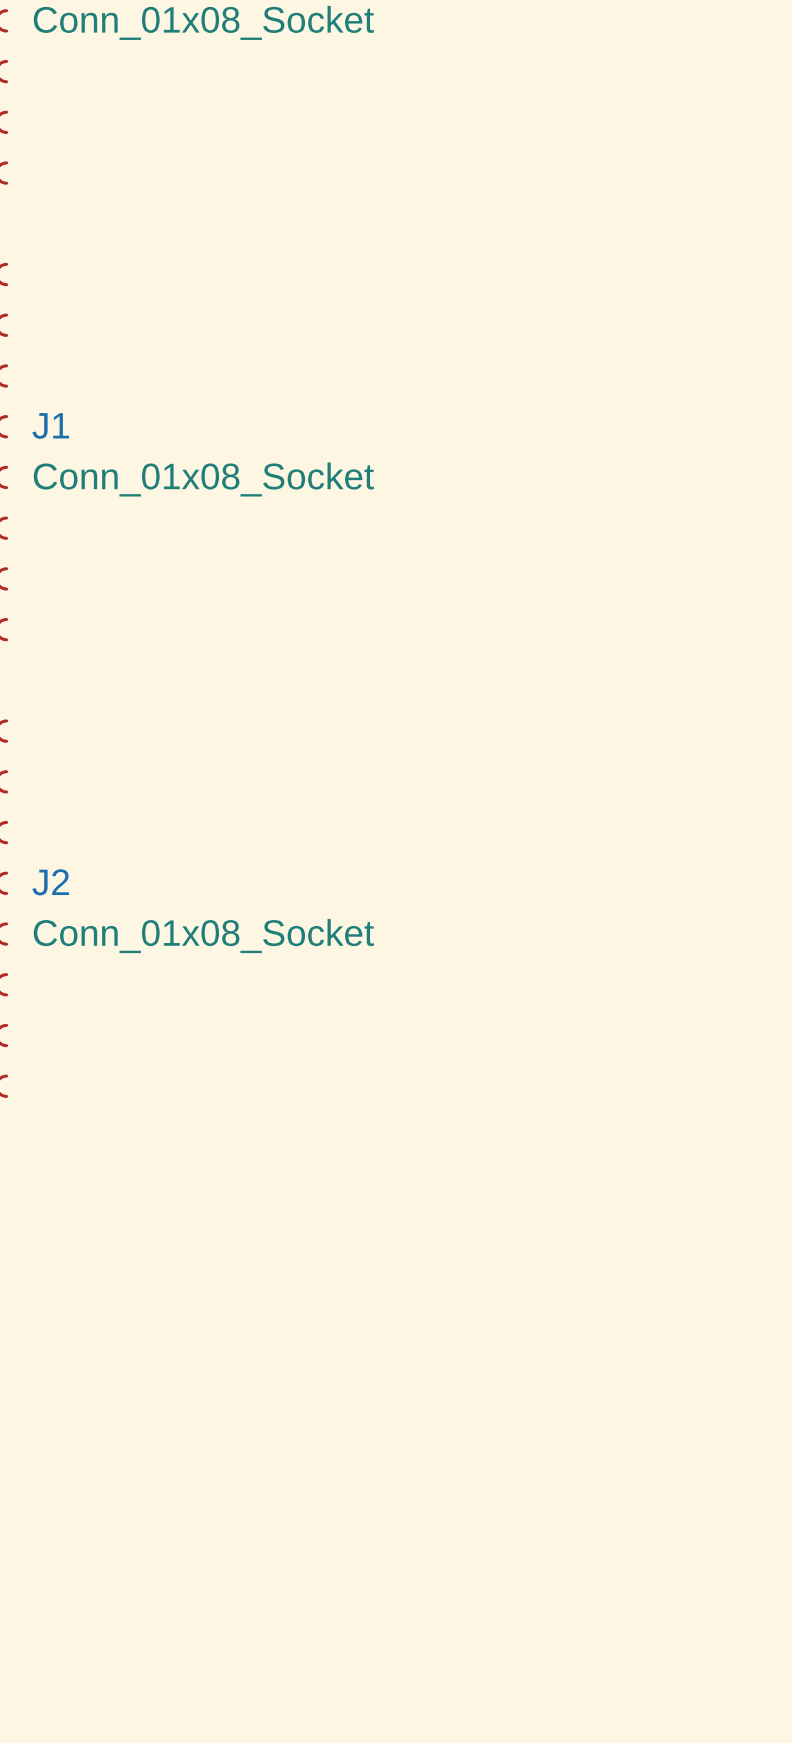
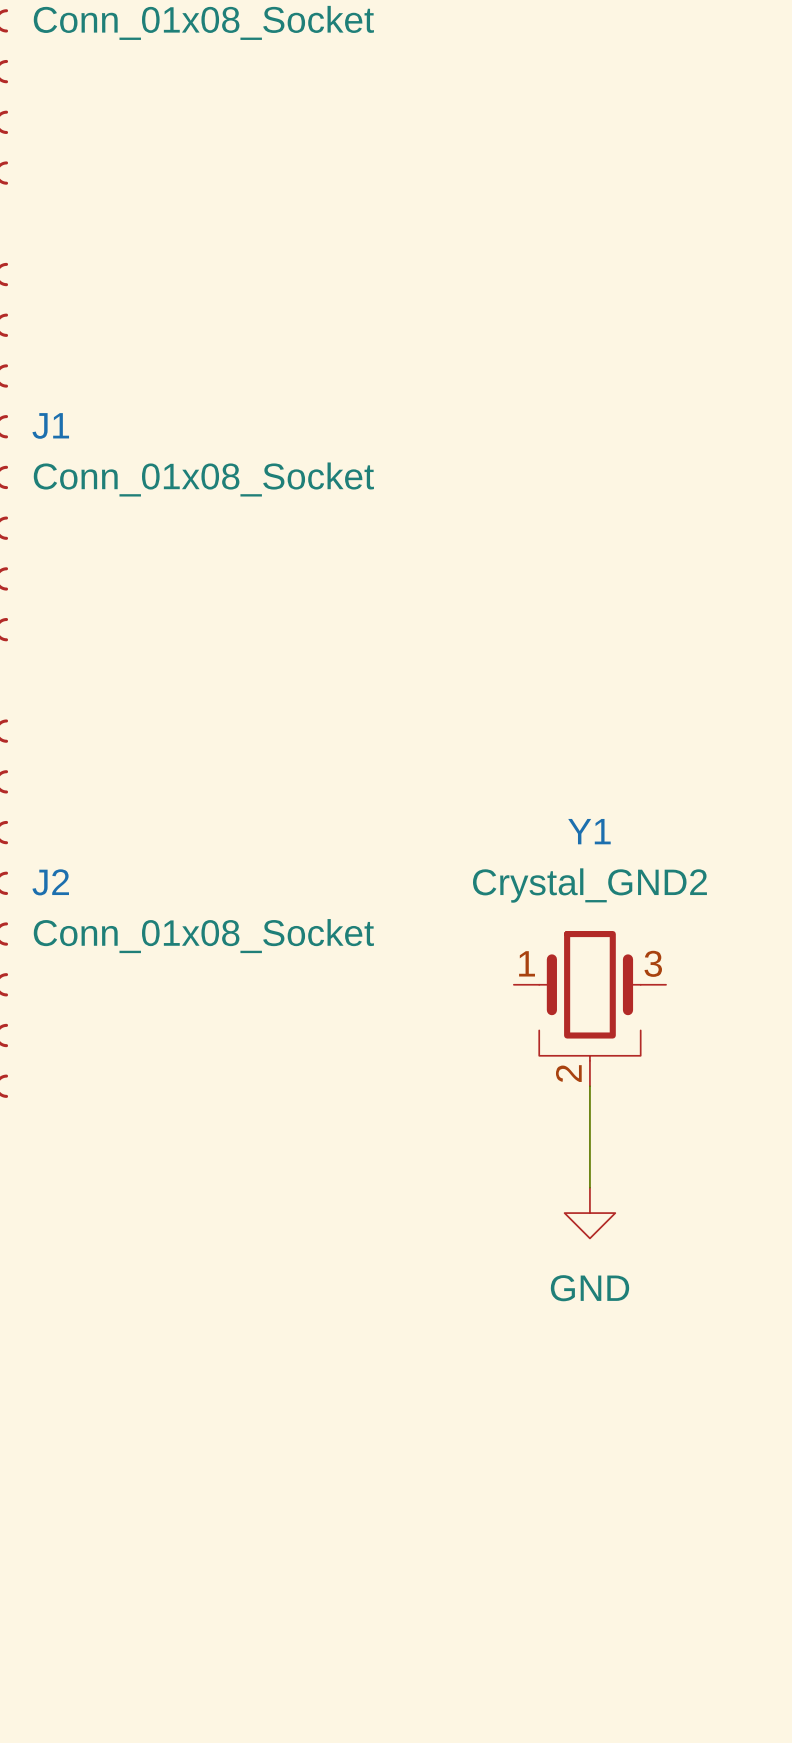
Y1: none -> Crystal_GND2 (589, 1008)
wire: none -> (589, 1086) (589, 1187)
power symbol: none -> GND (589, 1213)

